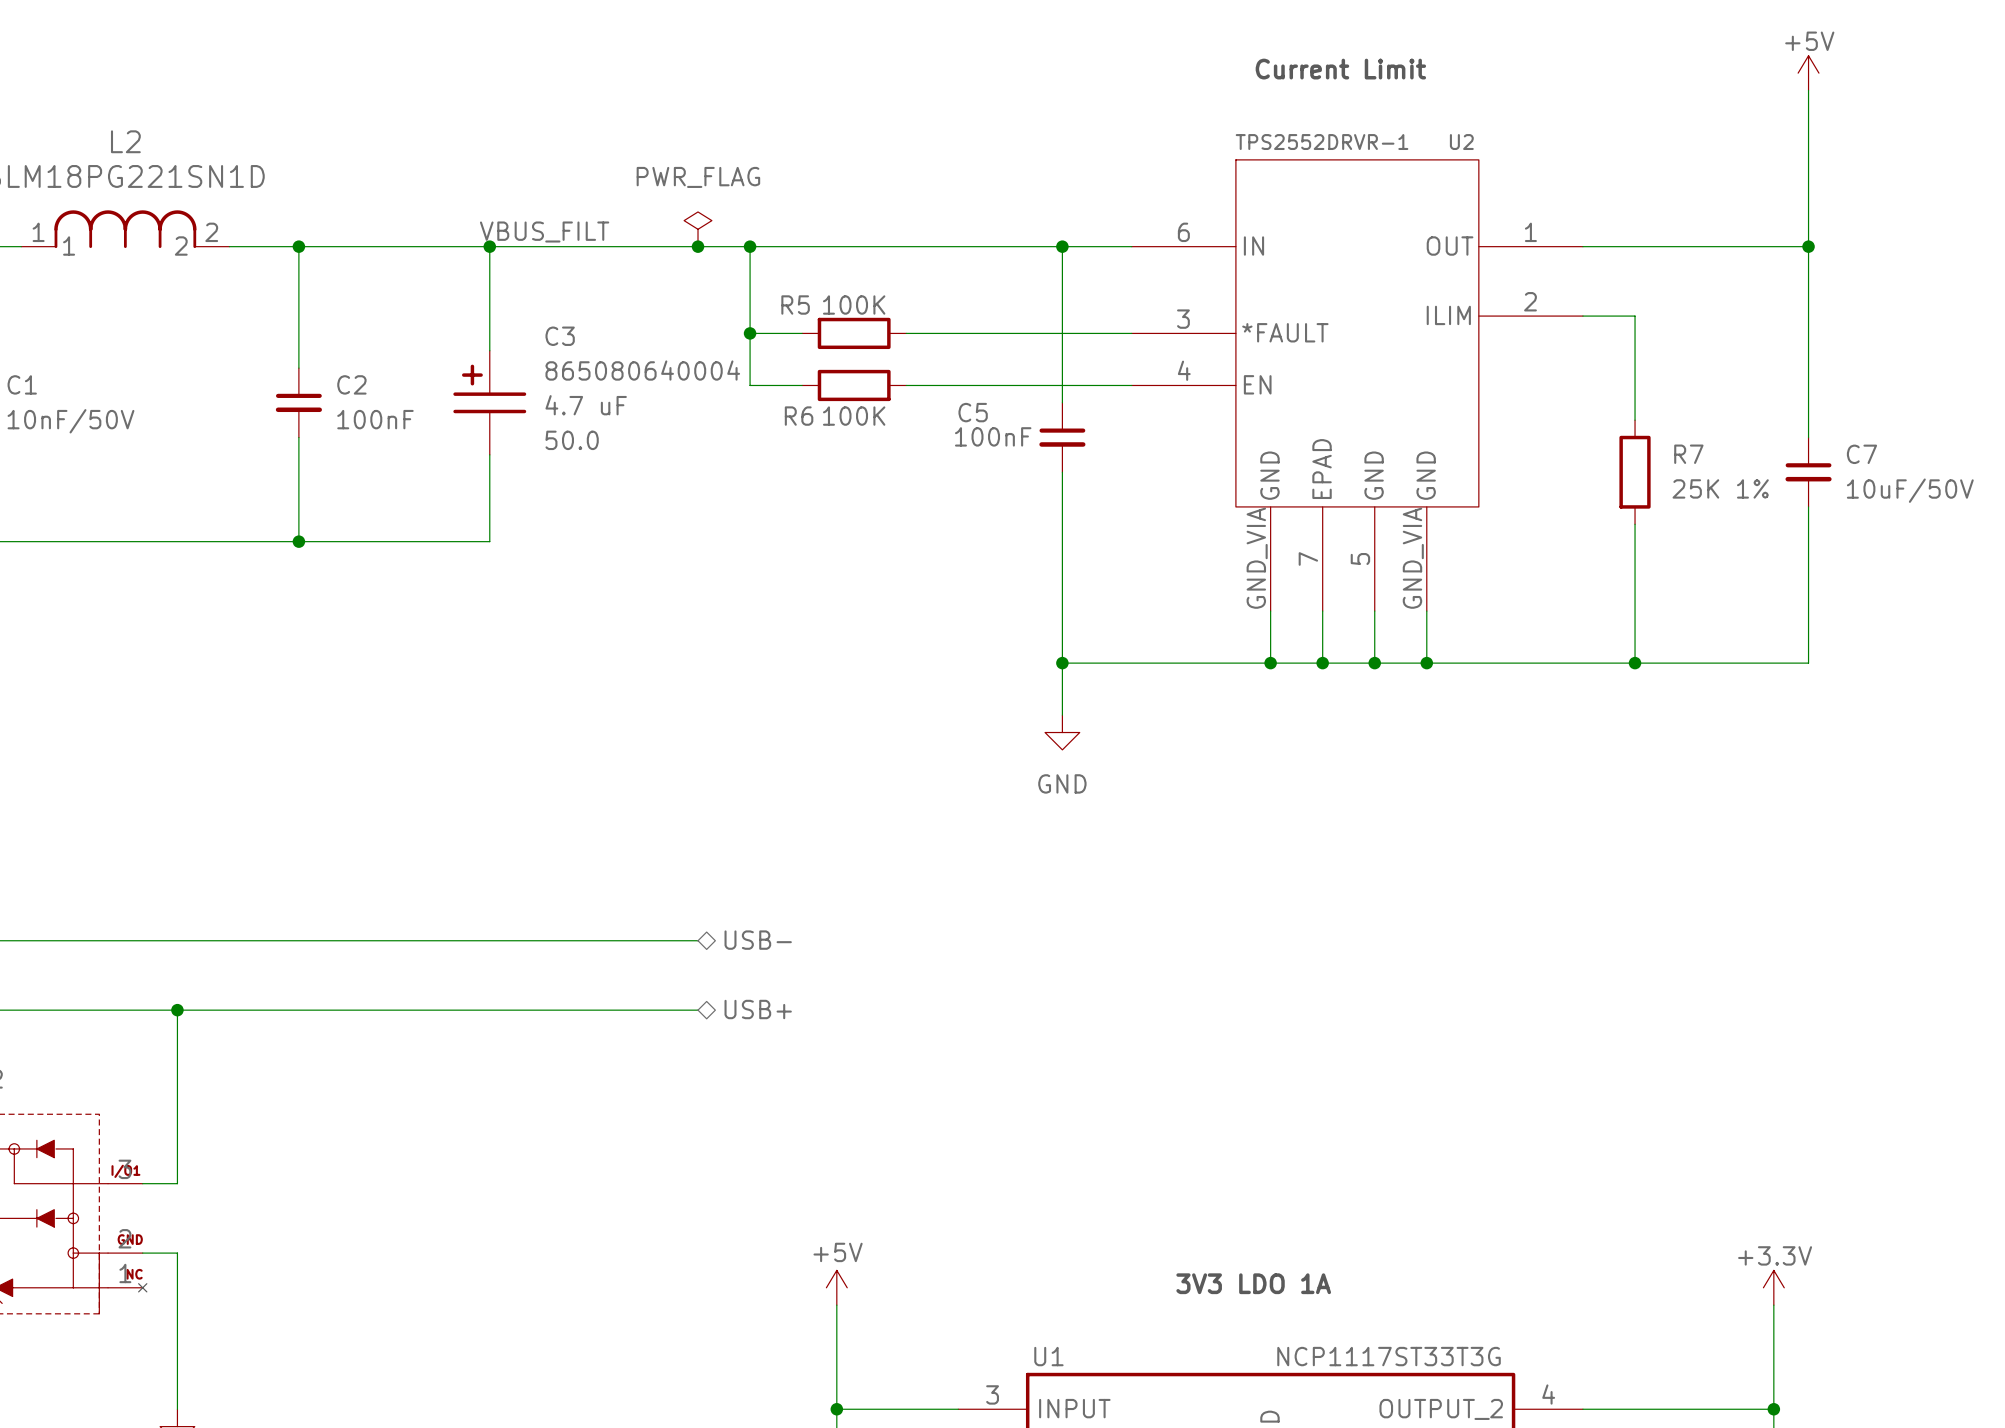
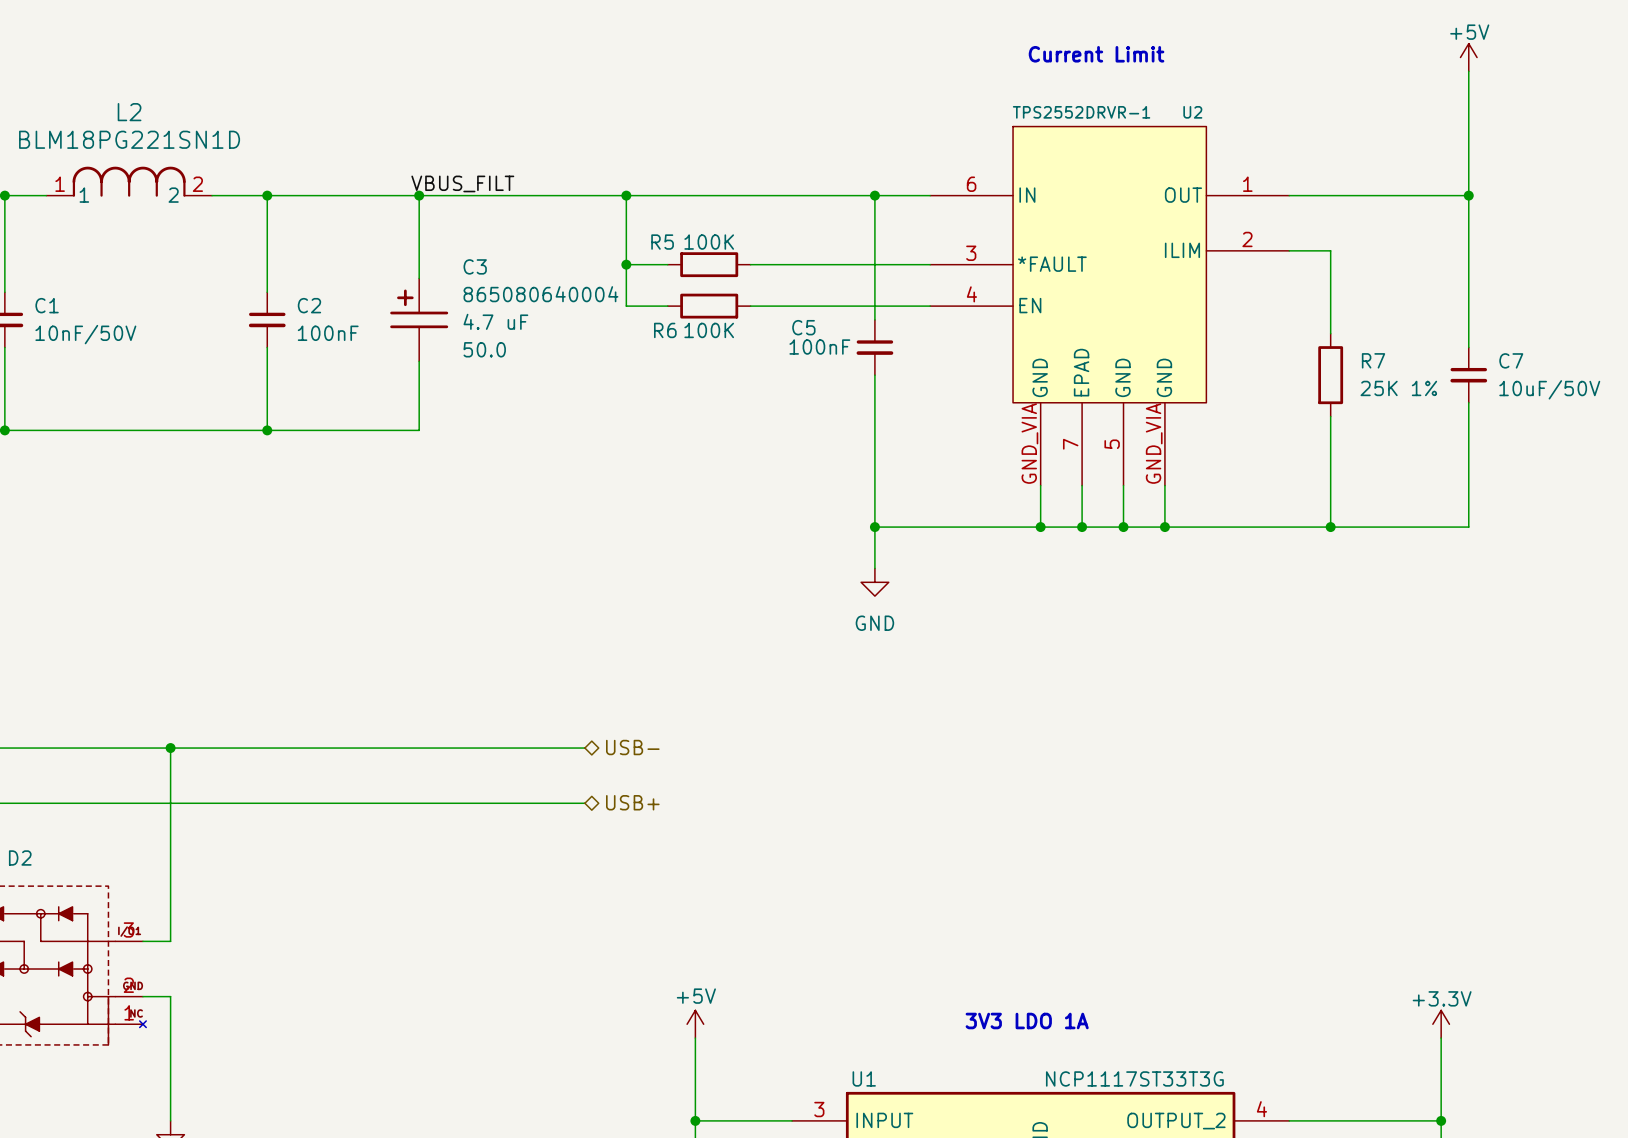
power symbol: PWR_FLAG (698, 229) -> none
junction: (698, 246) -> none
wire: none -> (170, 748) (170, 803)
junction position: (177, 1010) -> (170, 748)

